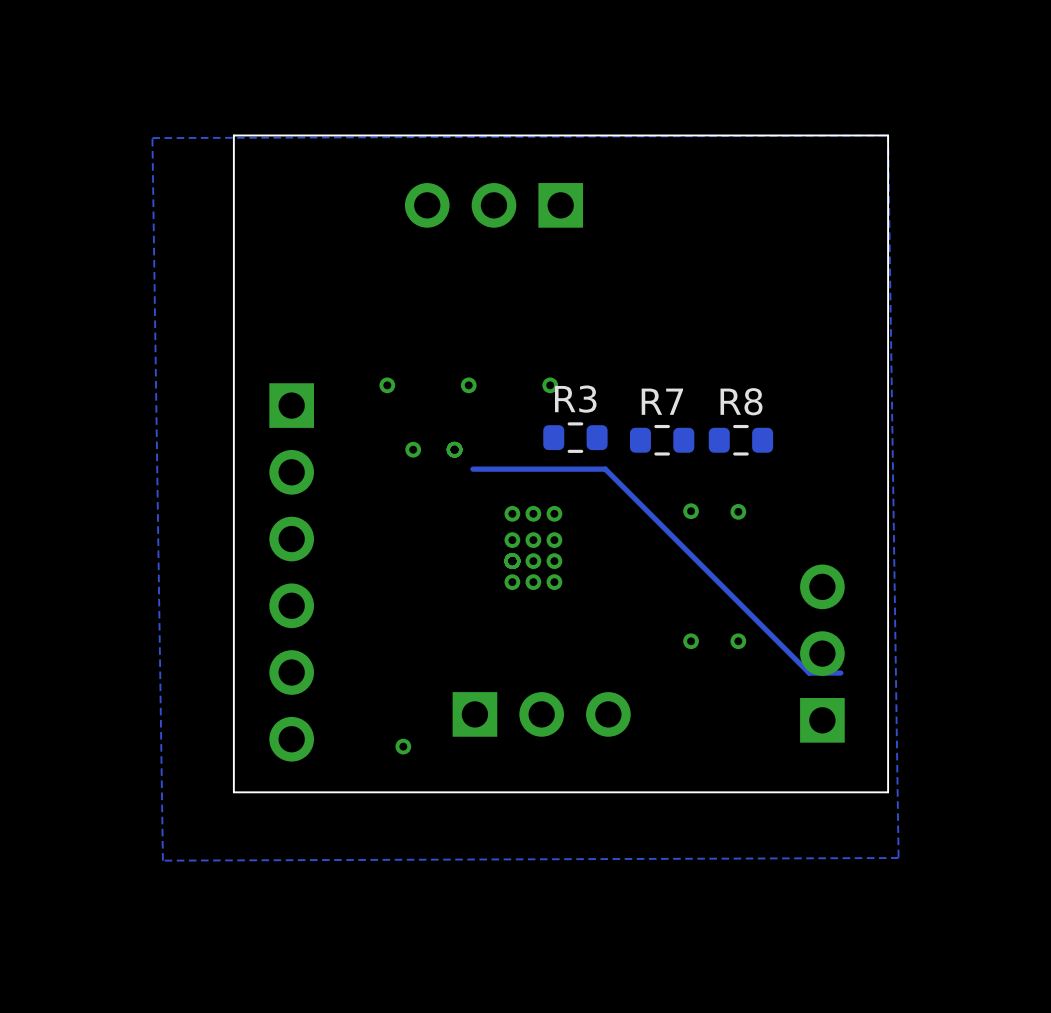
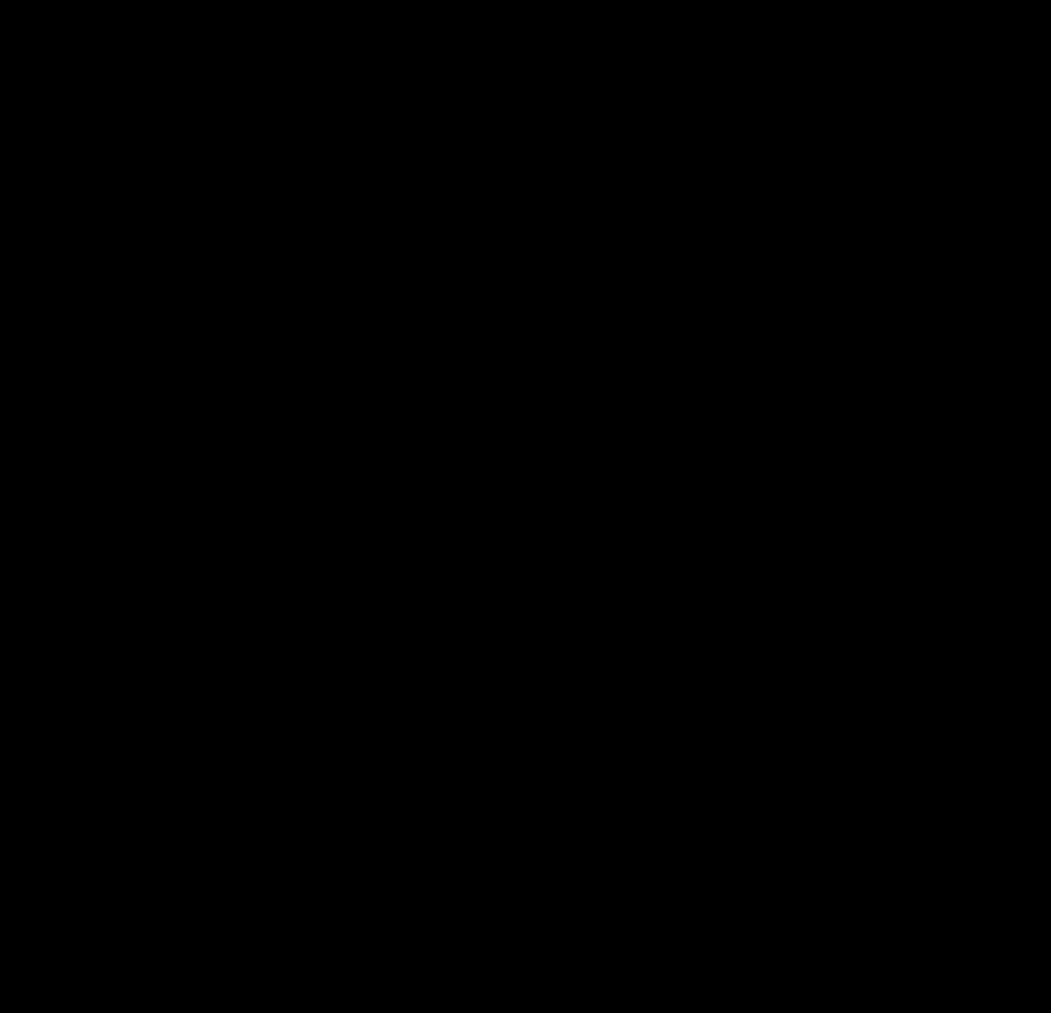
board edge: (888, 135) (233, 135) (233, 792) (888, 792) (888, 135) -> none
zone outline: (888, 135) (152, 138) (162, 860) (898, 858) (888, 135) -> none
part: (493, 205) -> none
via: (387, 385) -> none
via: (468, 385) -> none
via: (550, 385) -> none
R3: (575, 437) -> none
R7: (662, 440) -> none
R8: (740, 440) -> none
via: (413, 449) -> none
via: (454, 449) -> none
track: (472, 469) (605, 469) (809, 673) (840, 673) -> none
via: (691, 511) -> none
via: (738, 511) -> none
via: (512, 513) -> none
via: (533, 513) -> none
via: (554, 513) -> none
via: (512, 540) -> none
via: (533, 540) -> none
via: (554, 540) -> none
via: (512, 561) -> none
via: (533, 561) -> none
via: (554, 561) -> none
part: (291, 572) -> none
via: (512, 582) -> none
via: (533, 582) -> none
via: (554, 582) -> none
via: (691, 641) -> none
via: (738, 641) -> none
part: (822, 653) -> none
part: (541, 714) -> none
via: (403, 746) -> none

